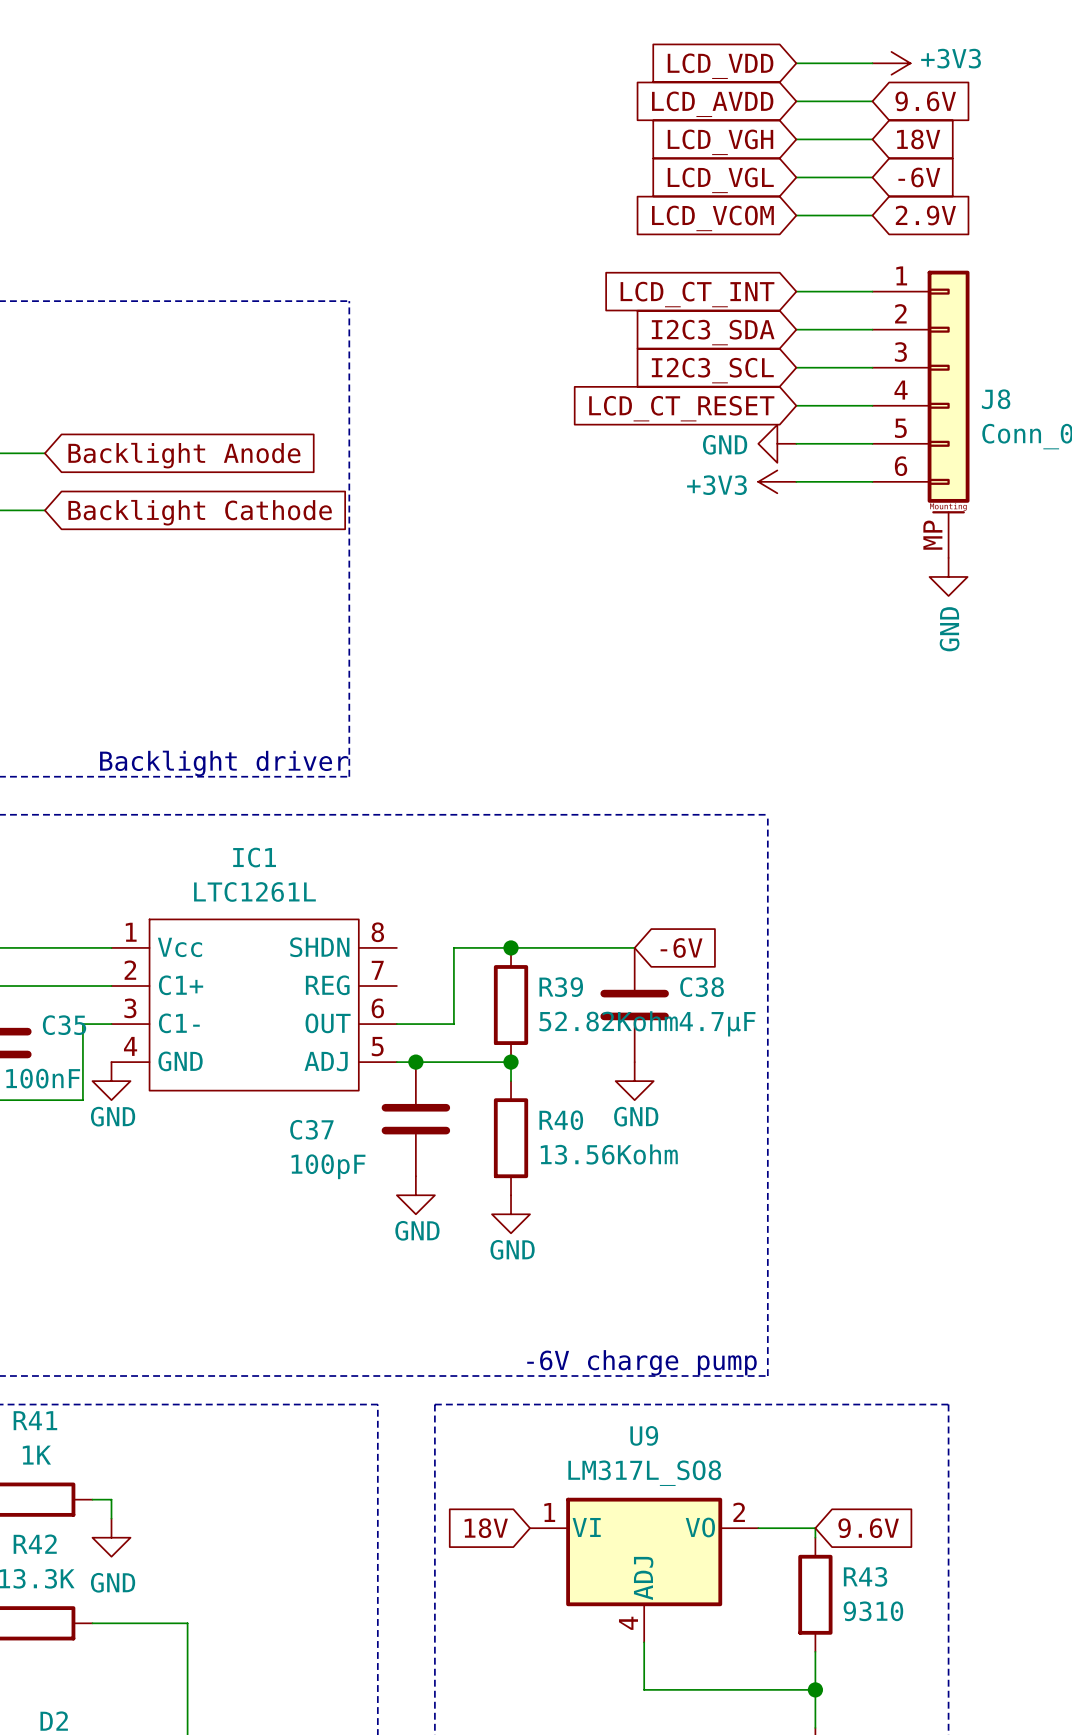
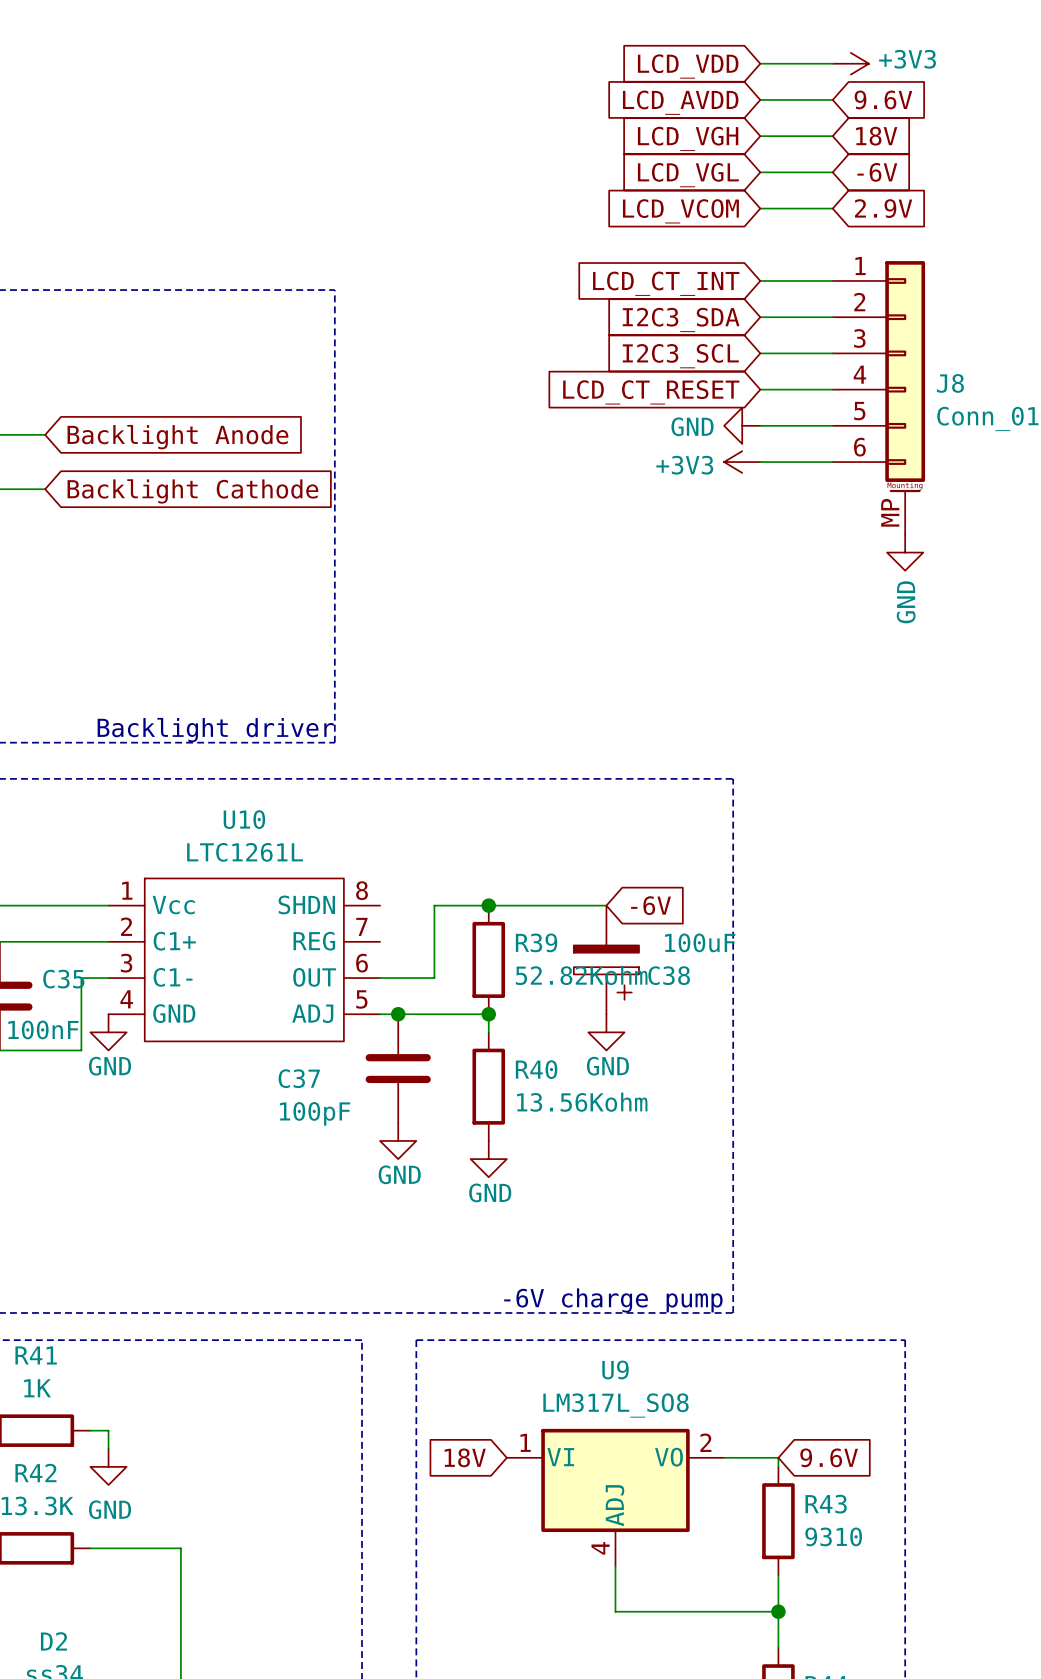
IC1 name: IC1 (254, 857) -> U10 (244, 819)
C38 symbol: [600, 947, 669, 1063] -> [573, 905, 640, 1015]
C38 name position: C38 (702, 987) -> C38 (669, 975)
C38 value: 4.7µF (717, 1024) -> 100uF (700, 942)

